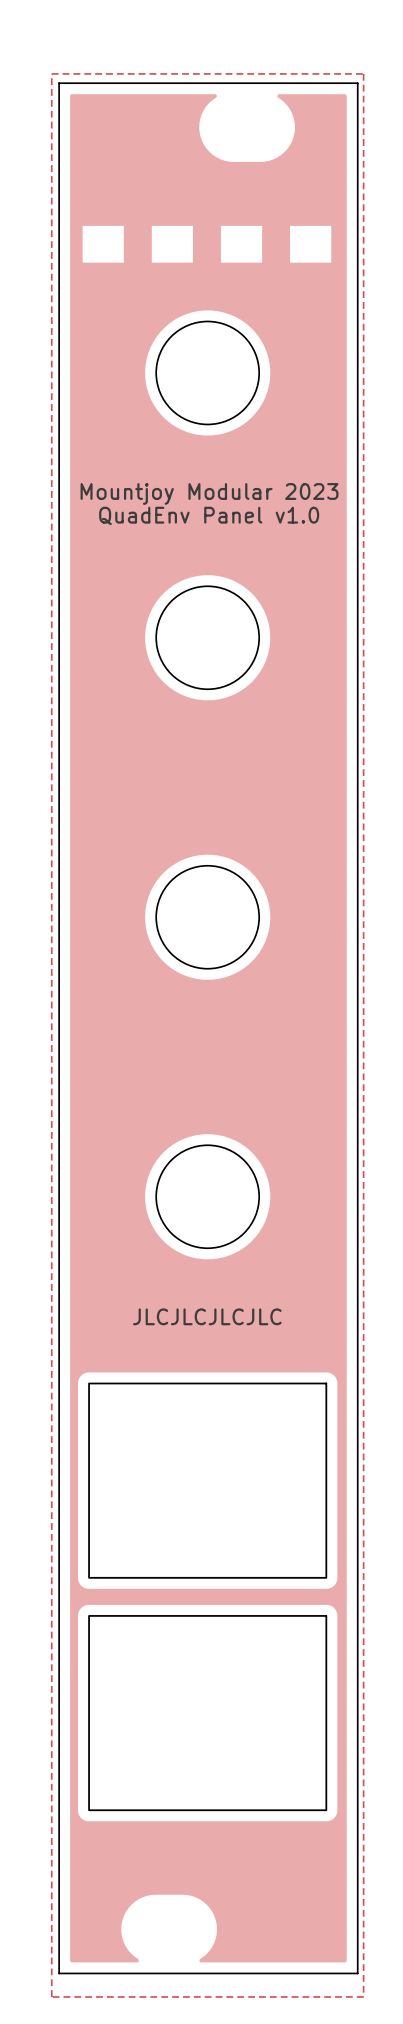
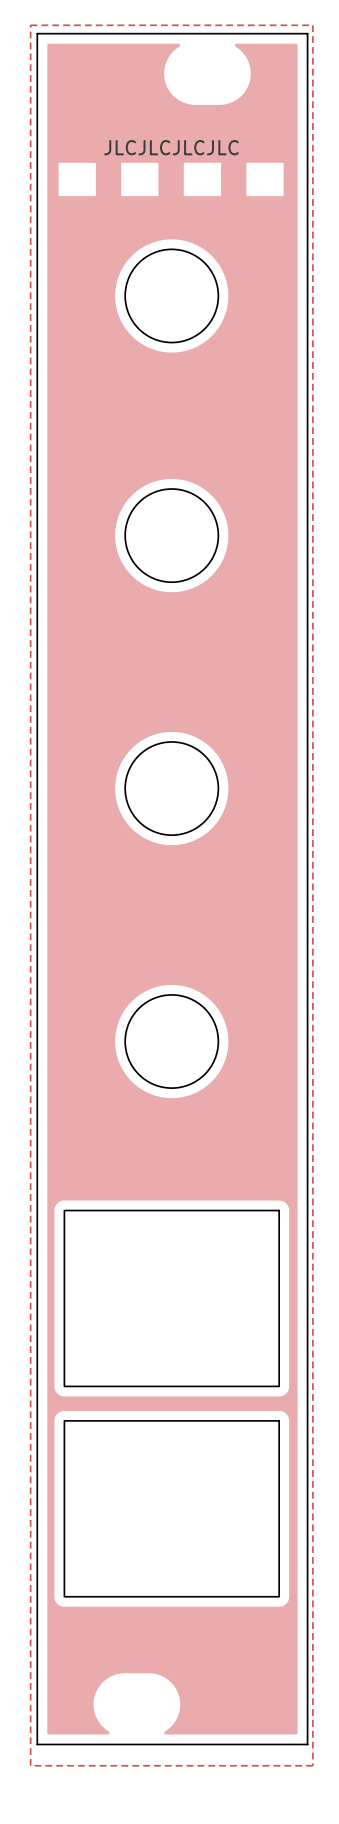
text: none -> JLCJLCJLCJLC (171, 147)
text: Mountjoy Modular 2023 (209, 493) -> none
text: QuadEnv Panel v1.0 (209, 515) -> none
text: JLCJLCJLCJLC (207, 1316) -> none

